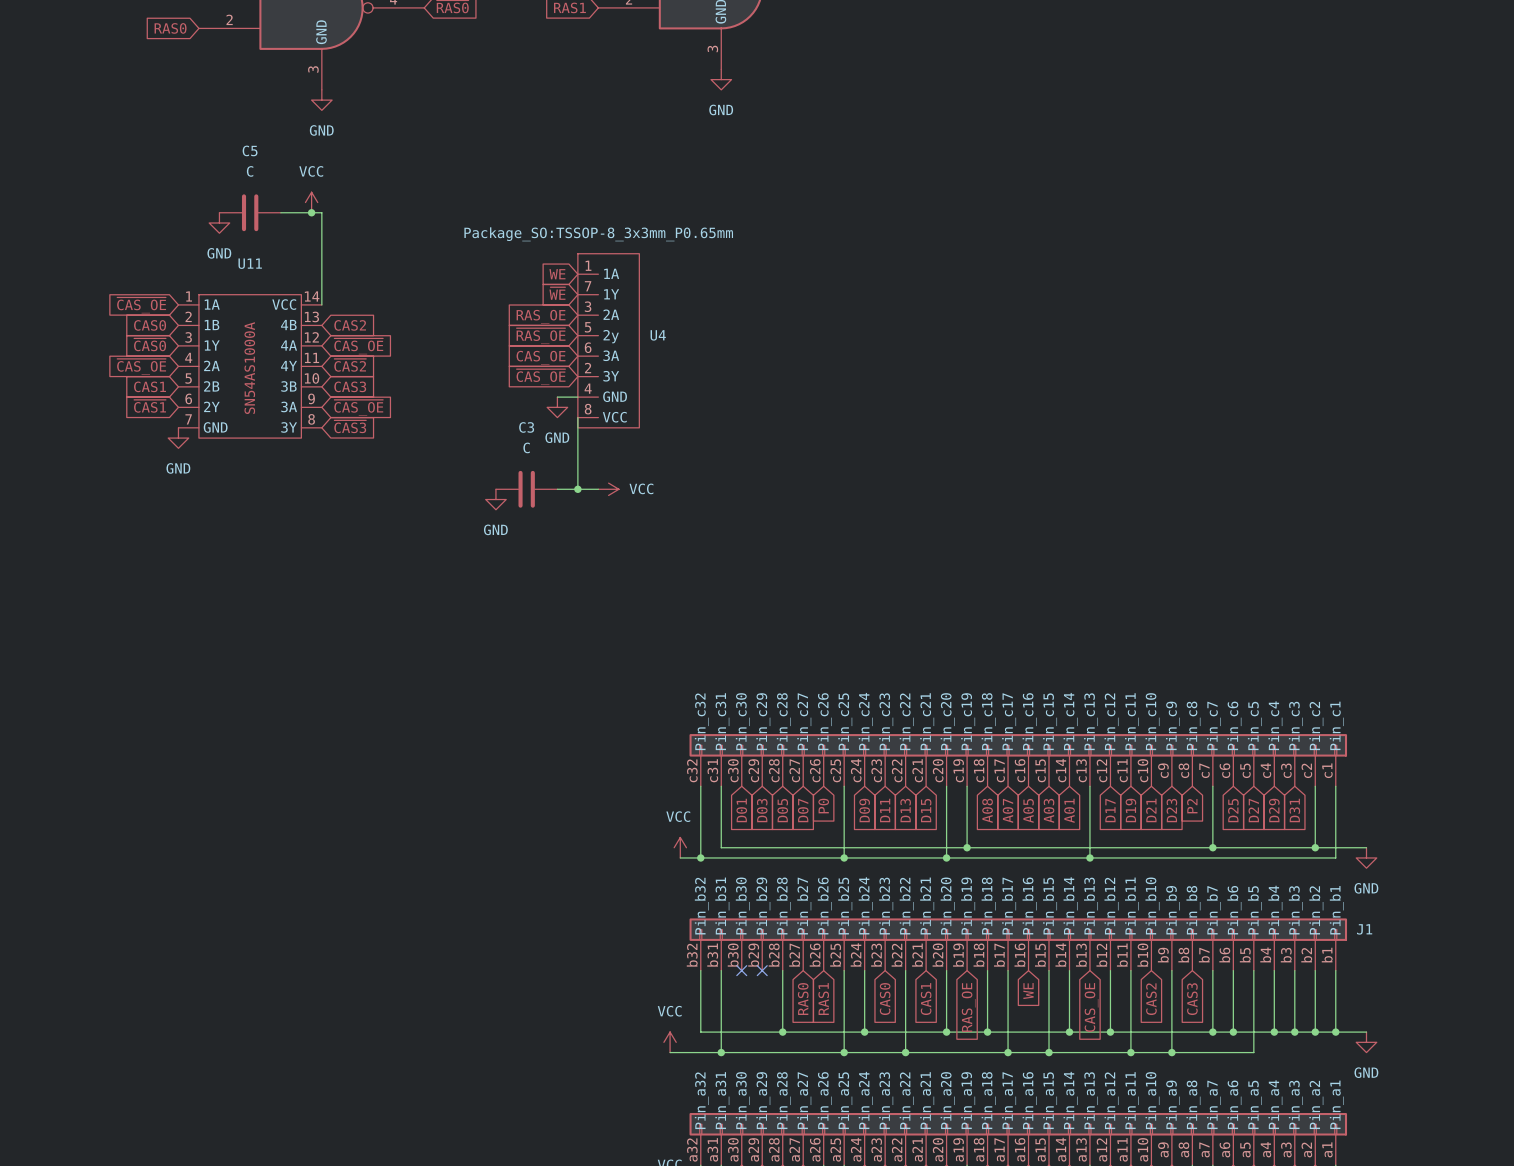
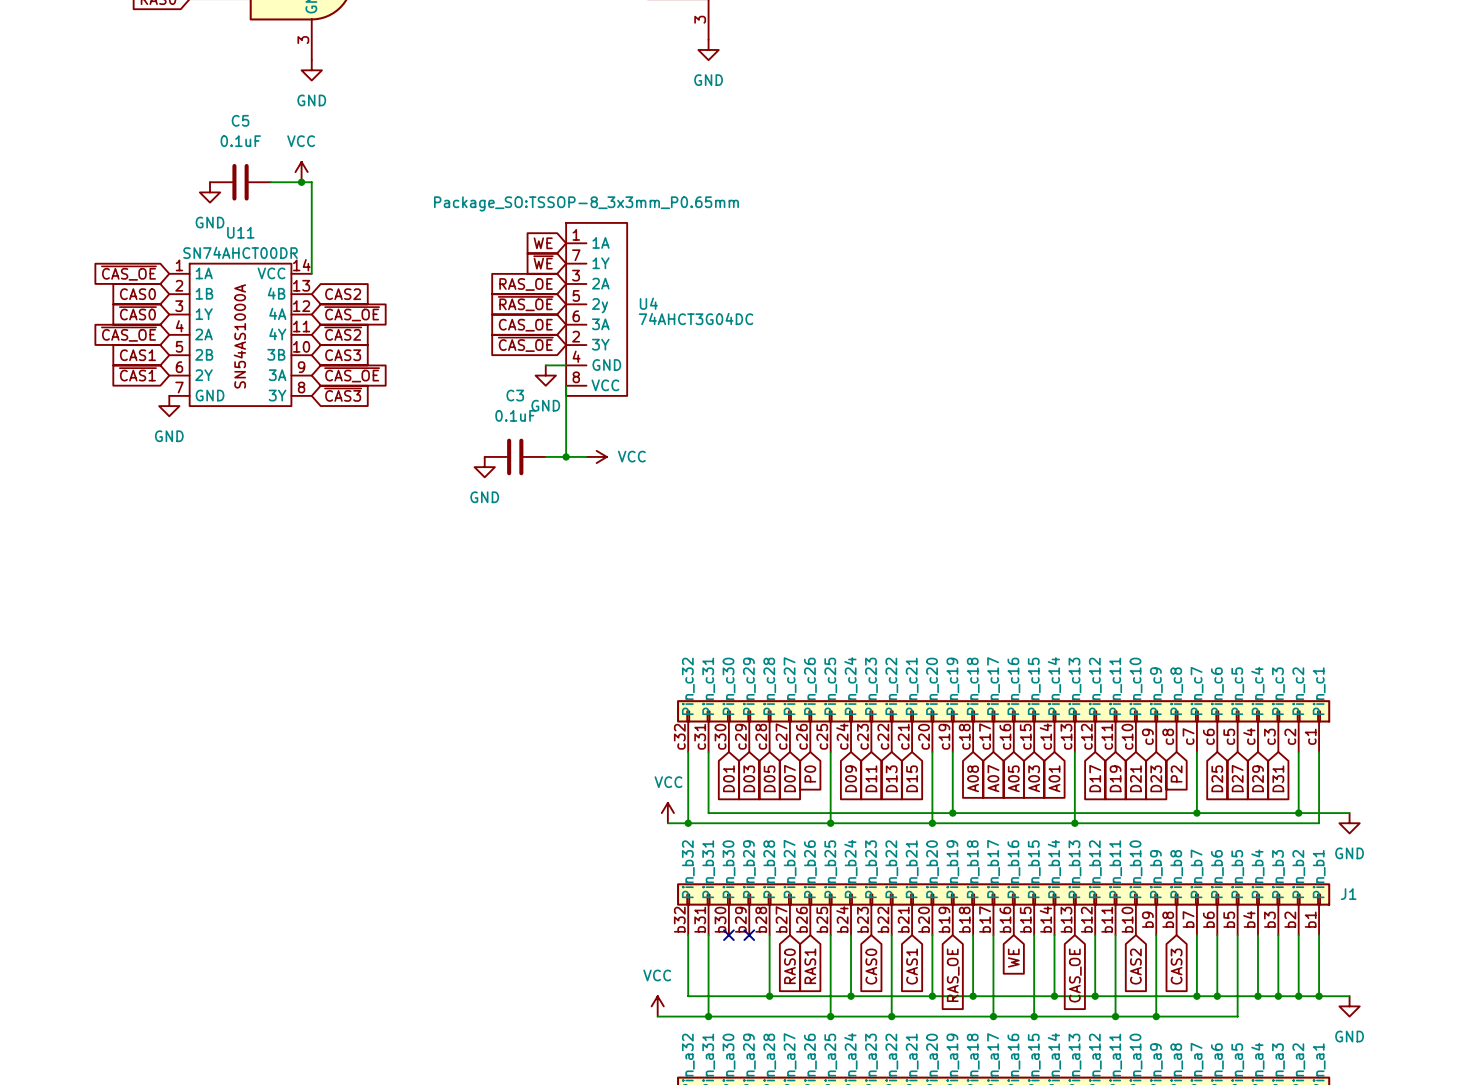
C5 value: C (250, 171) -> 0.1uF (240, 141)
U11 value: none -> SN74AHCT00DR (240, 252)
U4 value: none -> 74AHCT3G04DC (696, 318)
C3 value: C (526, 447) -> 0.1uF (515, 415)

